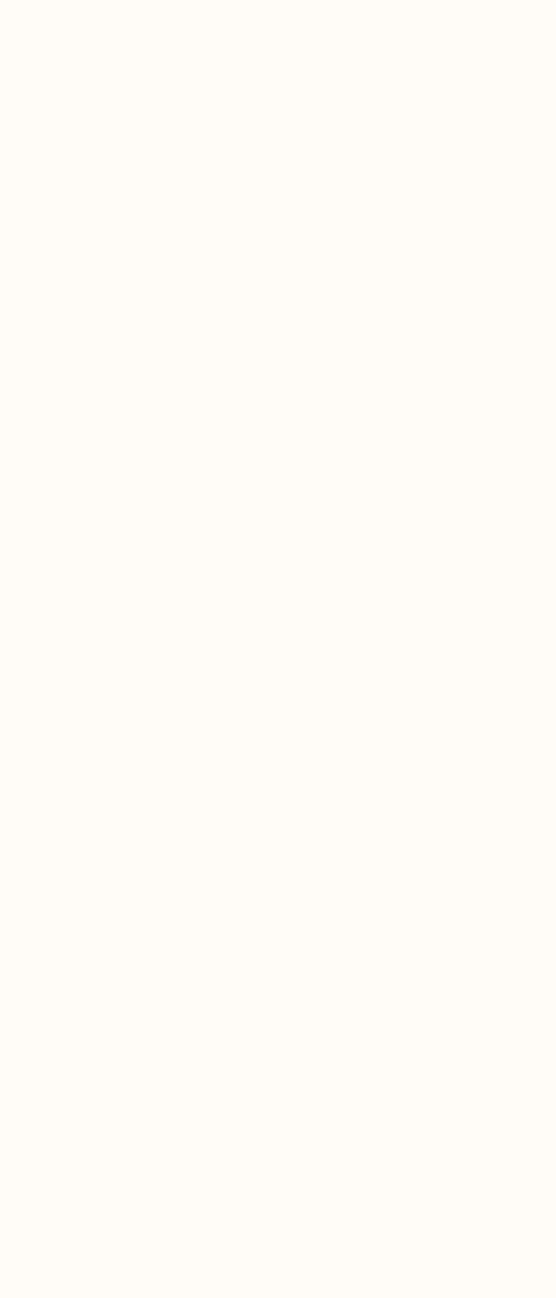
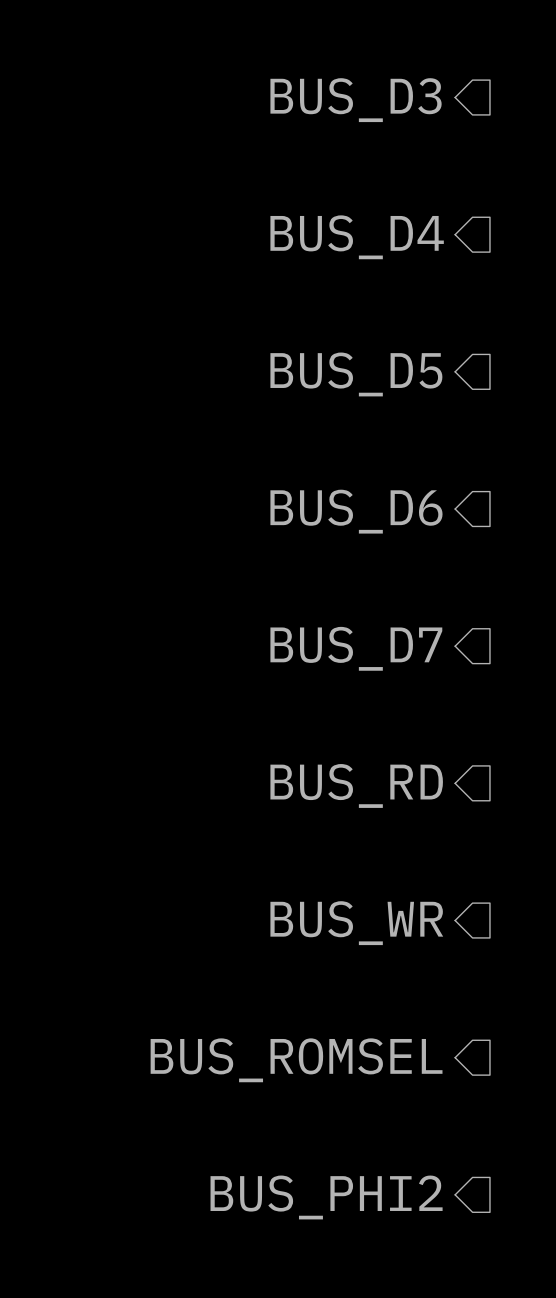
hierarchical label: none -> BUS_D3 (356, 100)
hierarchical label: none -> BUS_D4 (357, 237)
hierarchical label: none -> BUS_D5 (356, 374)
hierarchical label: none -> BUS_D6 (356, 511)
hierarchical label: none -> BUS_D7 (356, 648)
hierarchical label: none -> BUS_RD (356, 785)
hierarchical label: none -> BUS_WR (356, 923)
hierarchical label: none -> BUS_ROMSEL (296, 1060)
hierarchical label: none -> BUS_PHI2 (326, 1197)

